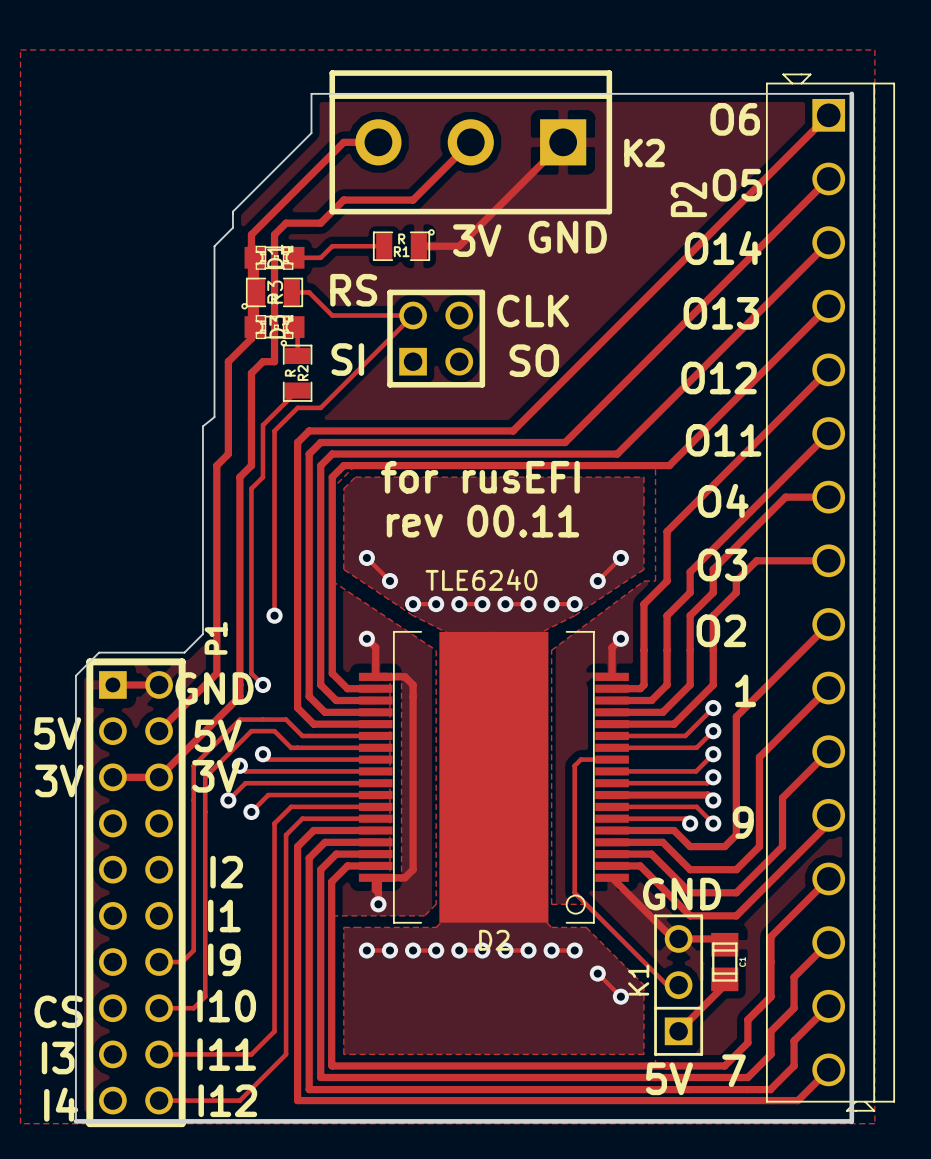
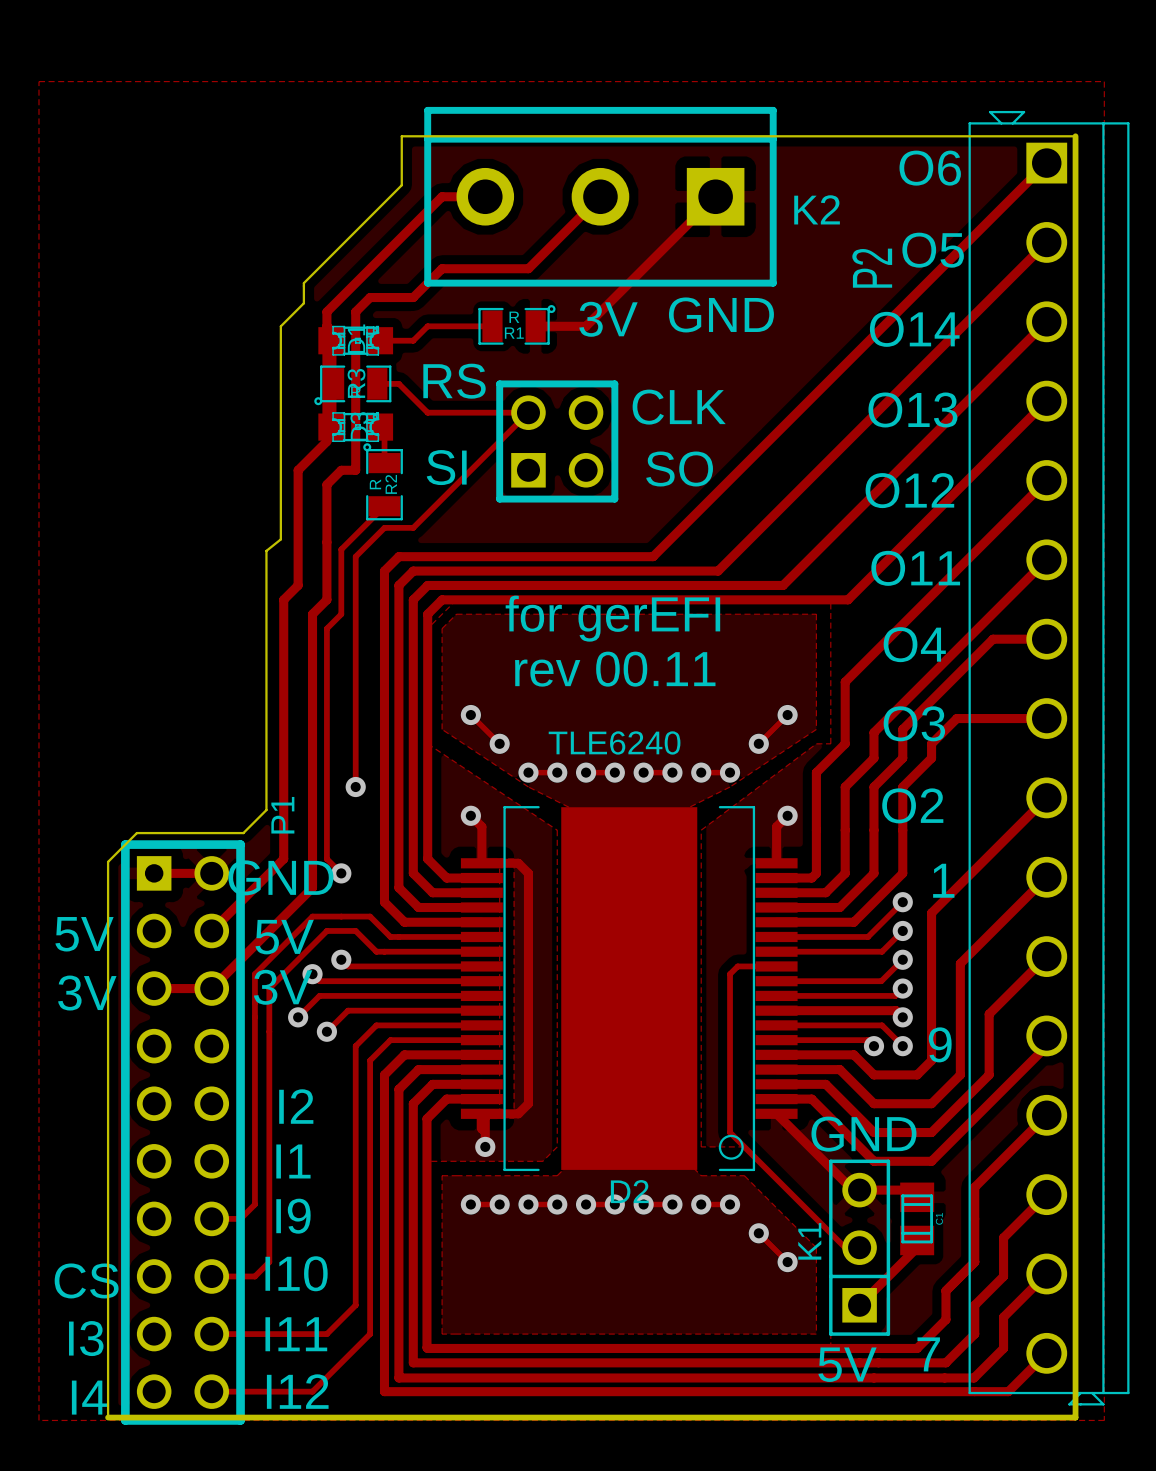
text: for rusEFI (480, 477) -> for gerEFI (612, 618)

